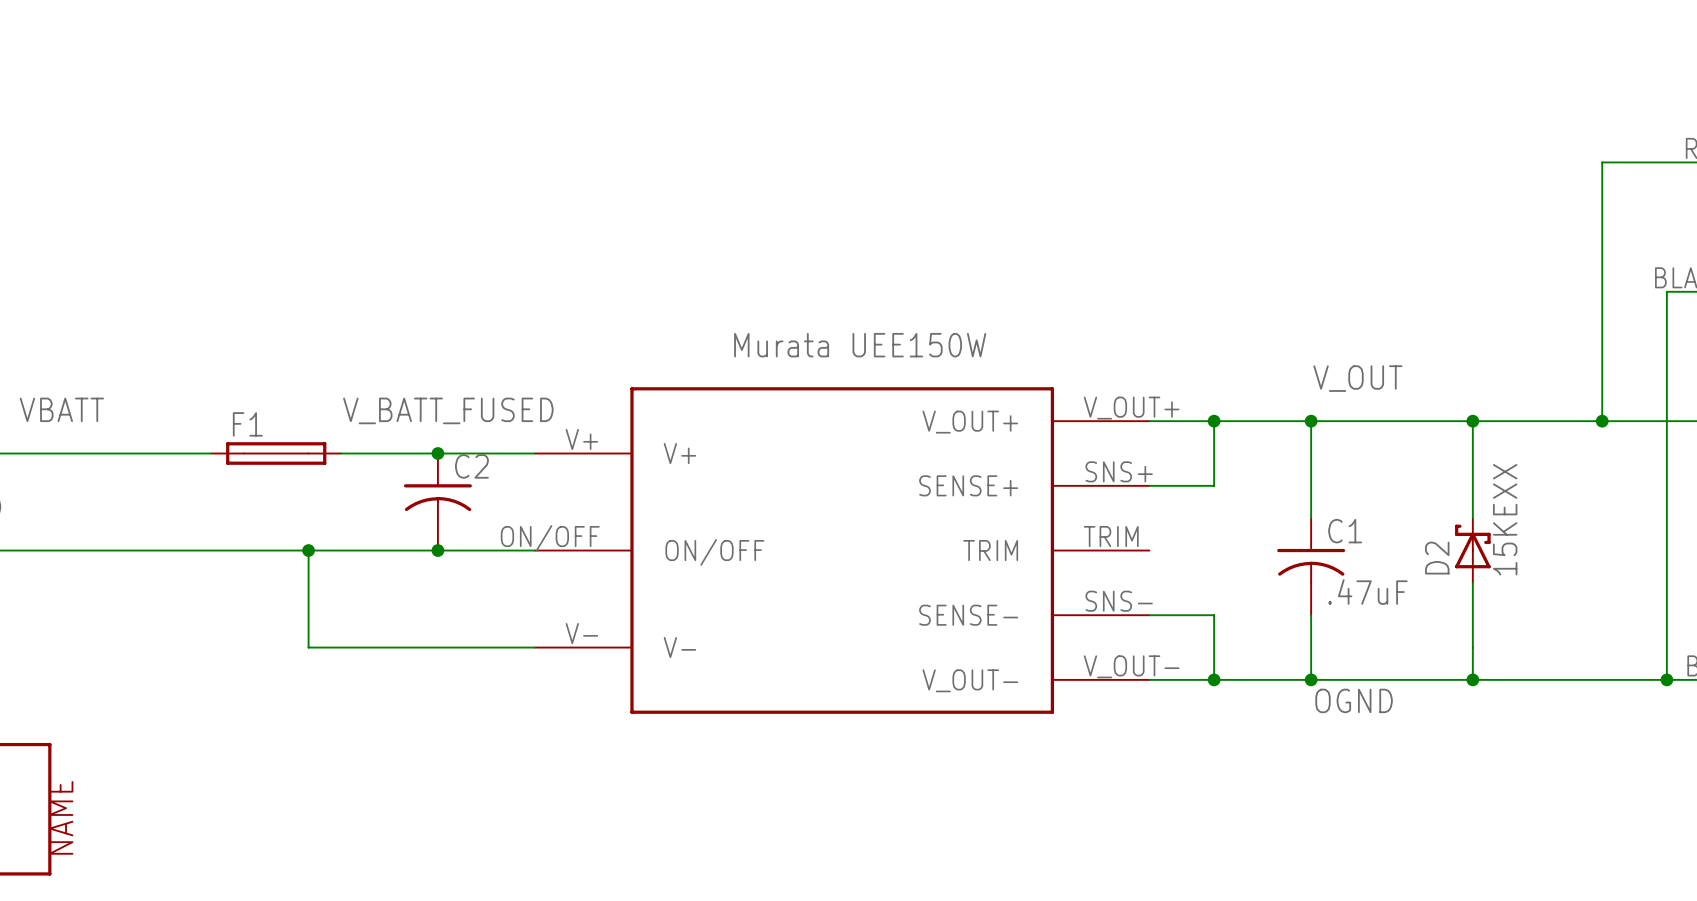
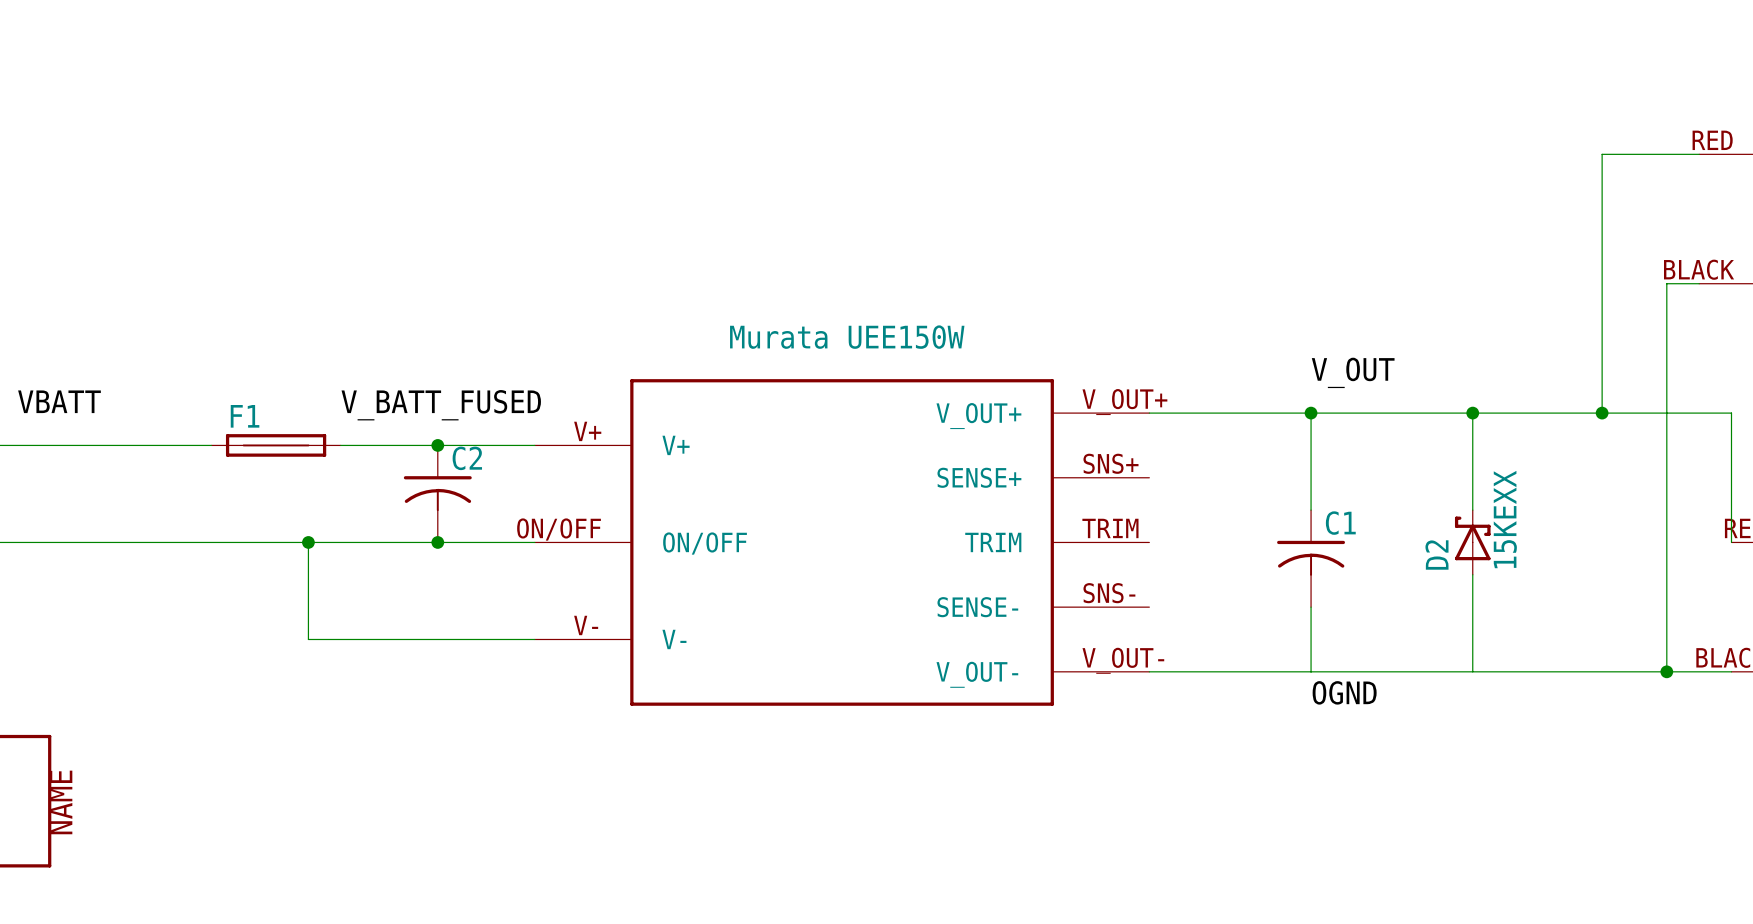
wire: (1214, 421) (1214, 485) (1149, 485) -> none
junction: (1214, 421) -> none
C1 value: .47uF (1367, 592) -> none
wire: (1149, 615) (1214, 615) (1214, 679) -> none
junction: (1214, 679) -> none
junction: (1311, 679) -> none
junction: (1472, 679) -> none

